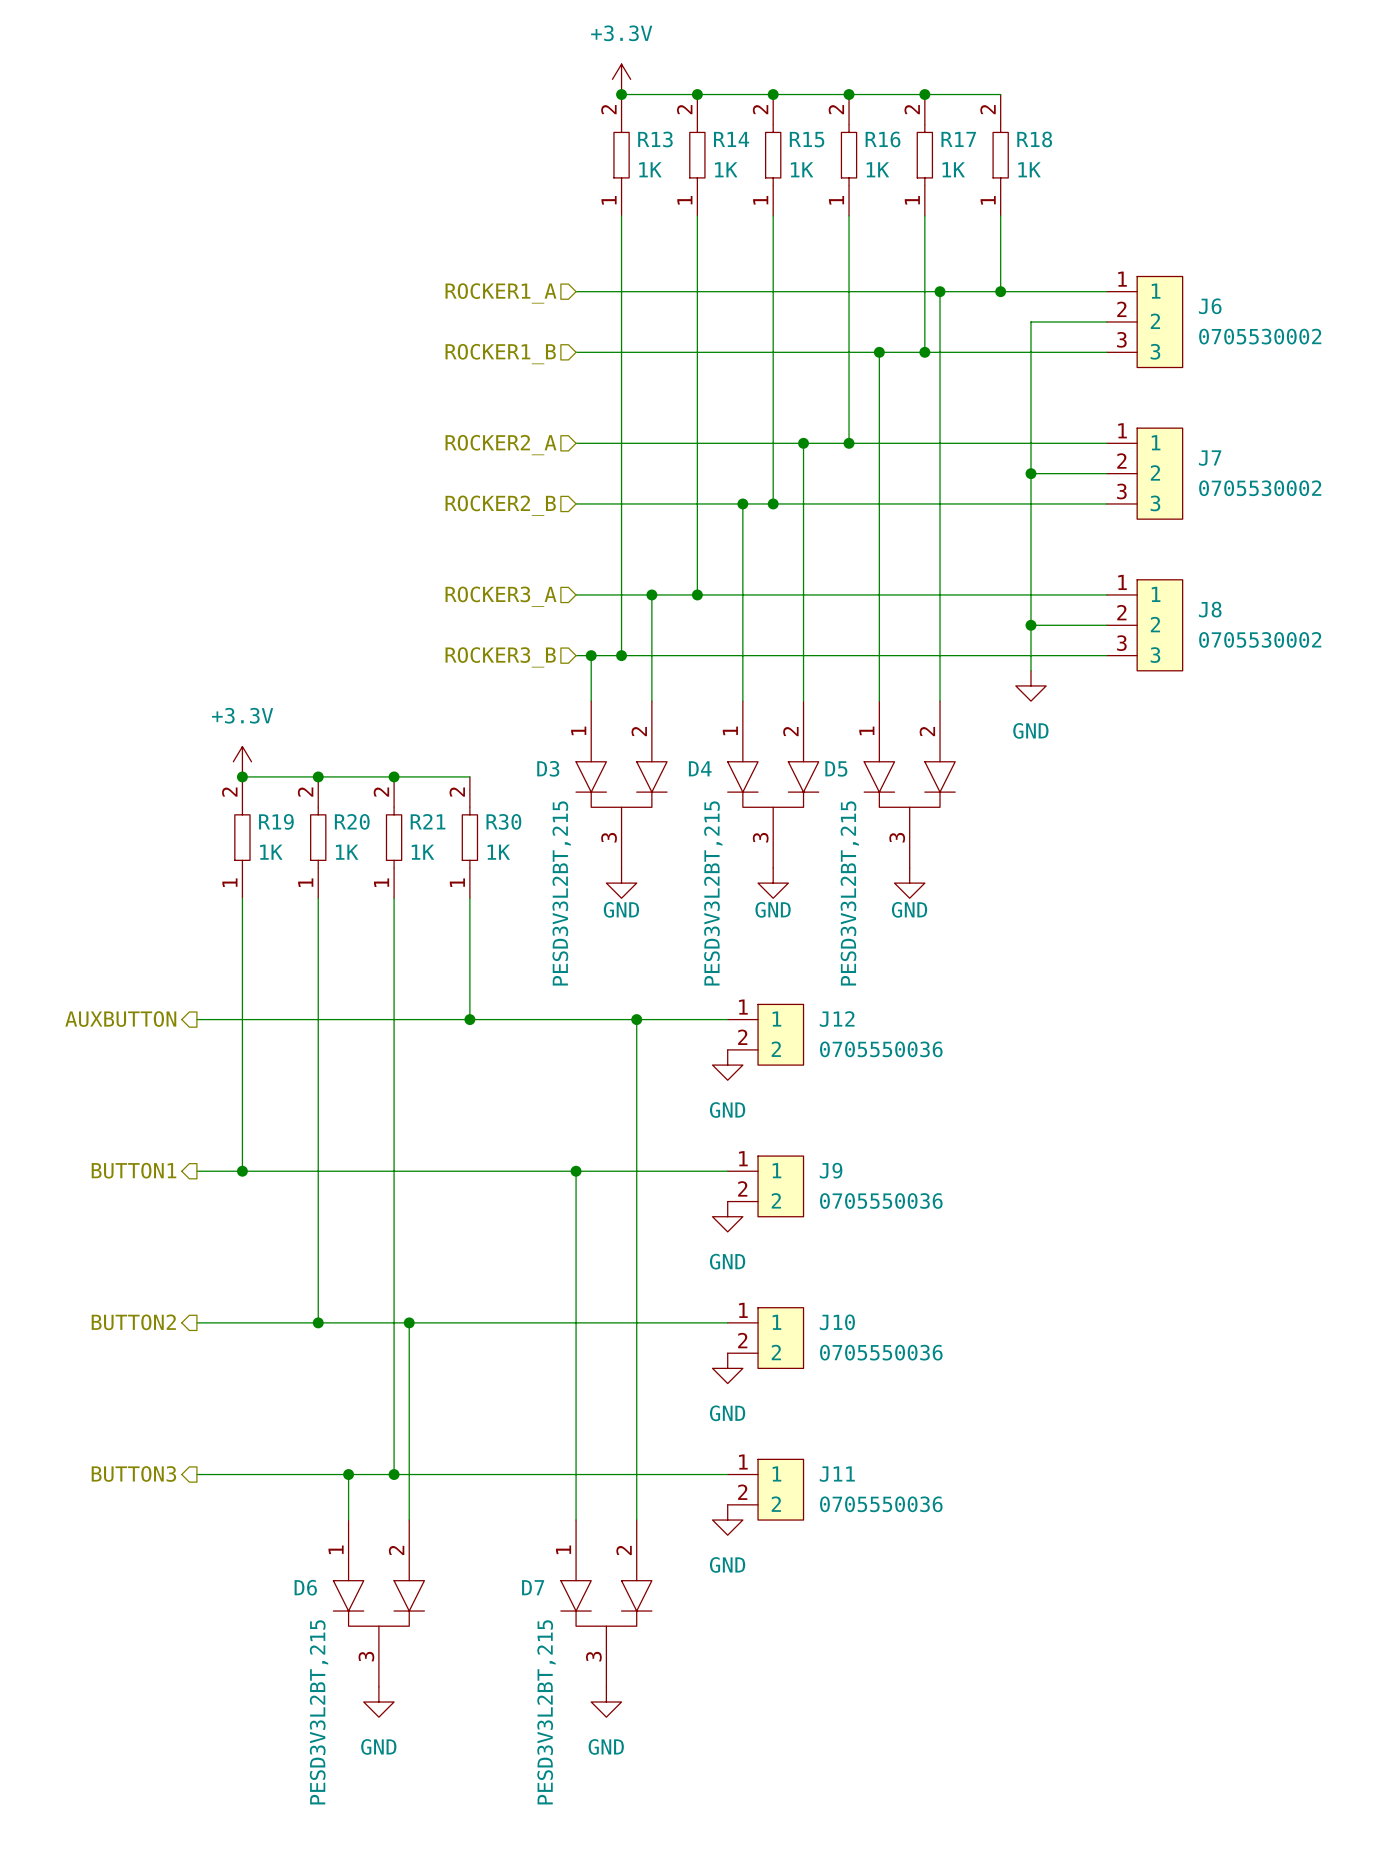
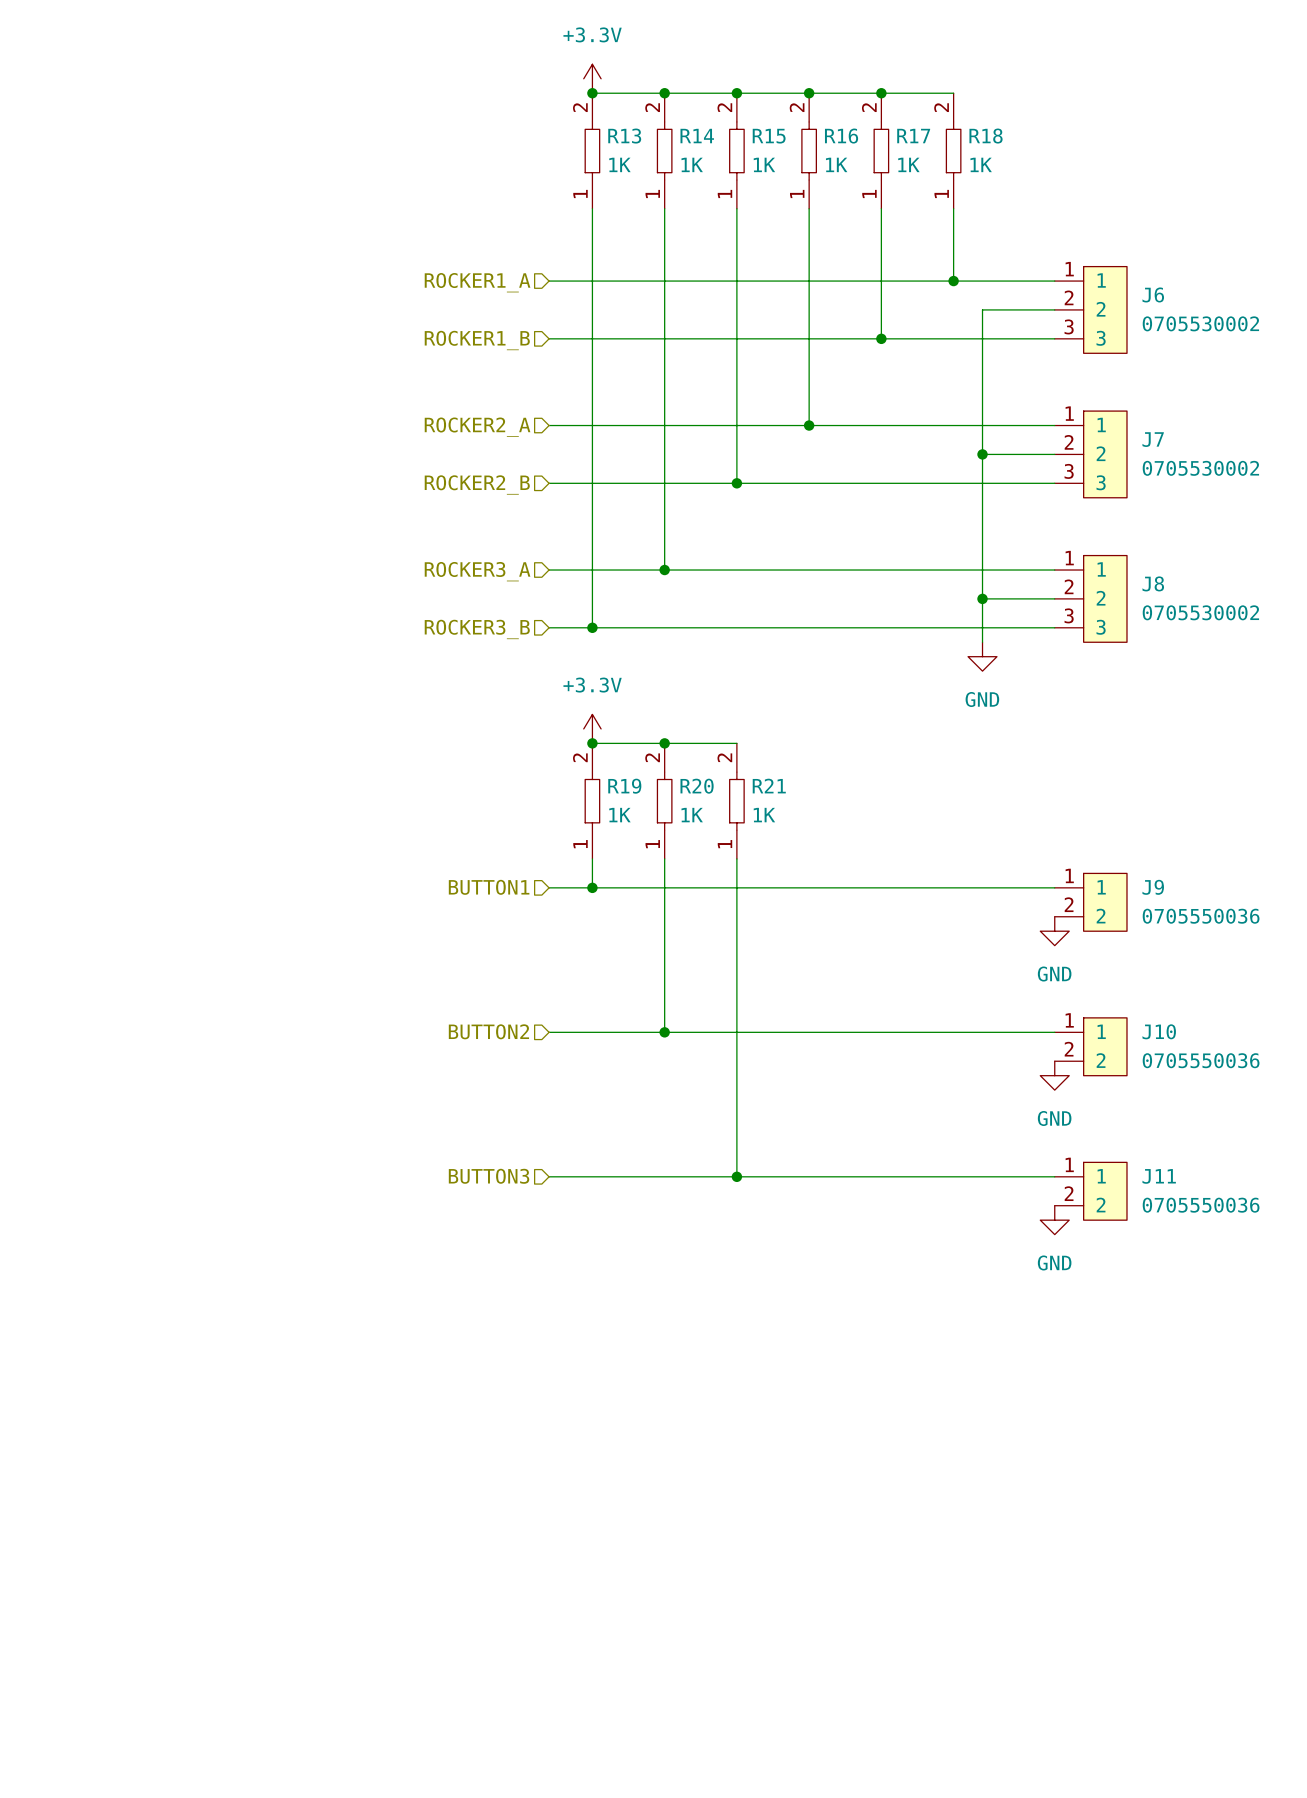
wire: (940, 291) (940, 701) -> none
junction: (940, 291) -> none
wire: (879, 352) (879, 701) -> none
junction: (879, 352) -> none
wire: (803, 443) (803, 701) -> none
junction: (803, 443) -> none
wire: (742, 503) (742, 701) -> none
junction: (742, 503) -> none
wire: (651, 594) (651, 701) -> none
junction: (651, 594) -> none
wire: (591, 655) (591, 701) -> none
junction: (591, 655) -> none
power symbol: +3.3V (242, 761) -> none
power symbol: none -> +3.3V (592, 728)
wire: (242, 776) (469, 776) -> none
junction: (242, 776) -> none
junction: (318, 776) -> none
junction: (394, 776) -> none
wire: none -> (592, 743) (736, 743)
junction: none -> (592, 743)
junction: none -> (664, 743)
D3: (621, 784) -> none
D4: (773, 784) -> none
D5: (909, 784) -> none
R19 position: (242, 837) -> (592, 801)
R20 position: (318, 837) -> (664, 801)
R21 position: (394, 837) -> (736, 801)
R30: (469, 837) -> none
power symbol: GND (621, 883) -> none
power symbol: GND (773, 883) -> none
power symbol: GND (909, 883) -> none
wire: (242, 898) (242, 1171) -> none
wire: (318, 898) (318, 1322) -> none
wire: (394, 898) (394, 1474) -> none
wire: (469, 898) (469, 1019) -> none
wire: none -> (592, 858) (592, 887)
wire: none -> (664, 858) (664, 1032)
wire: none -> (736, 858) (736, 1176)
hierarchical label: none -> BUTTON1 (489, 887)
wire: none -> (549, 887) (1054, 887)
junction: none -> (592, 887)
power symbol: none -> GND (1054, 931)
hierarchical label: AUXBUTTON (120, 1019) -> none
wire: (196, 1019) (727, 1019) -> none
junction: (469, 1019) -> none
wire: (636, 1019) (636, 1520) -> none
junction: (636, 1019) -> none
J12: 0705550036 (765, 1034) -> none
power symbol: GND (727, 1065) -> none
hierarchical label: none -> BUTTON2 (488, 1031)
wire: none -> (549, 1032) (1054, 1032)
junction: none -> (664, 1032)
power symbol: none -> GND (1054, 1075)
hierarchical label: BUTTON1 (133, 1170) -> none
wire: (196, 1171) (727, 1171) -> none
junction: (242, 1171) -> none
wire: (576, 1171) (576, 1520) -> none
junction: (576, 1171) -> none
J9 position: (765, 1186) -> (1090, 902)
power symbol: GND (727, 1216) -> none
hierarchical label: none -> BUTTON3 (489, 1176)
wire: none -> (549, 1176) (1054, 1176)
junction: none -> (736, 1176)
power symbol: none -> GND (1054, 1220)
hierarchical label: BUTTON2 (133, 1322) -> none
wire: (196, 1322) (727, 1322) -> none
junction: (318, 1322) -> none
wire: (409, 1322) (409, 1520) -> none
junction: (409, 1322) -> none
J10 position: (765, 1338) -> (1090, 1046)
power symbol: GND (727, 1368) -> none
hierarchical label: BUTTON3 (133, 1473) -> none
wire: (196, 1474) (727, 1474) -> none
wire: (348, 1474) (348, 1520) -> none
junction: (348, 1474) -> none
junction: (394, 1474) -> none
J11 position: (765, 1489) -> (1090, 1191)
power symbol: GND (727, 1520) -> none
D6: (378, 1603) -> none
D7: (606, 1603) -> none
power symbol: GND (378, 1702) -> none
power symbol: GND (606, 1702) -> none

